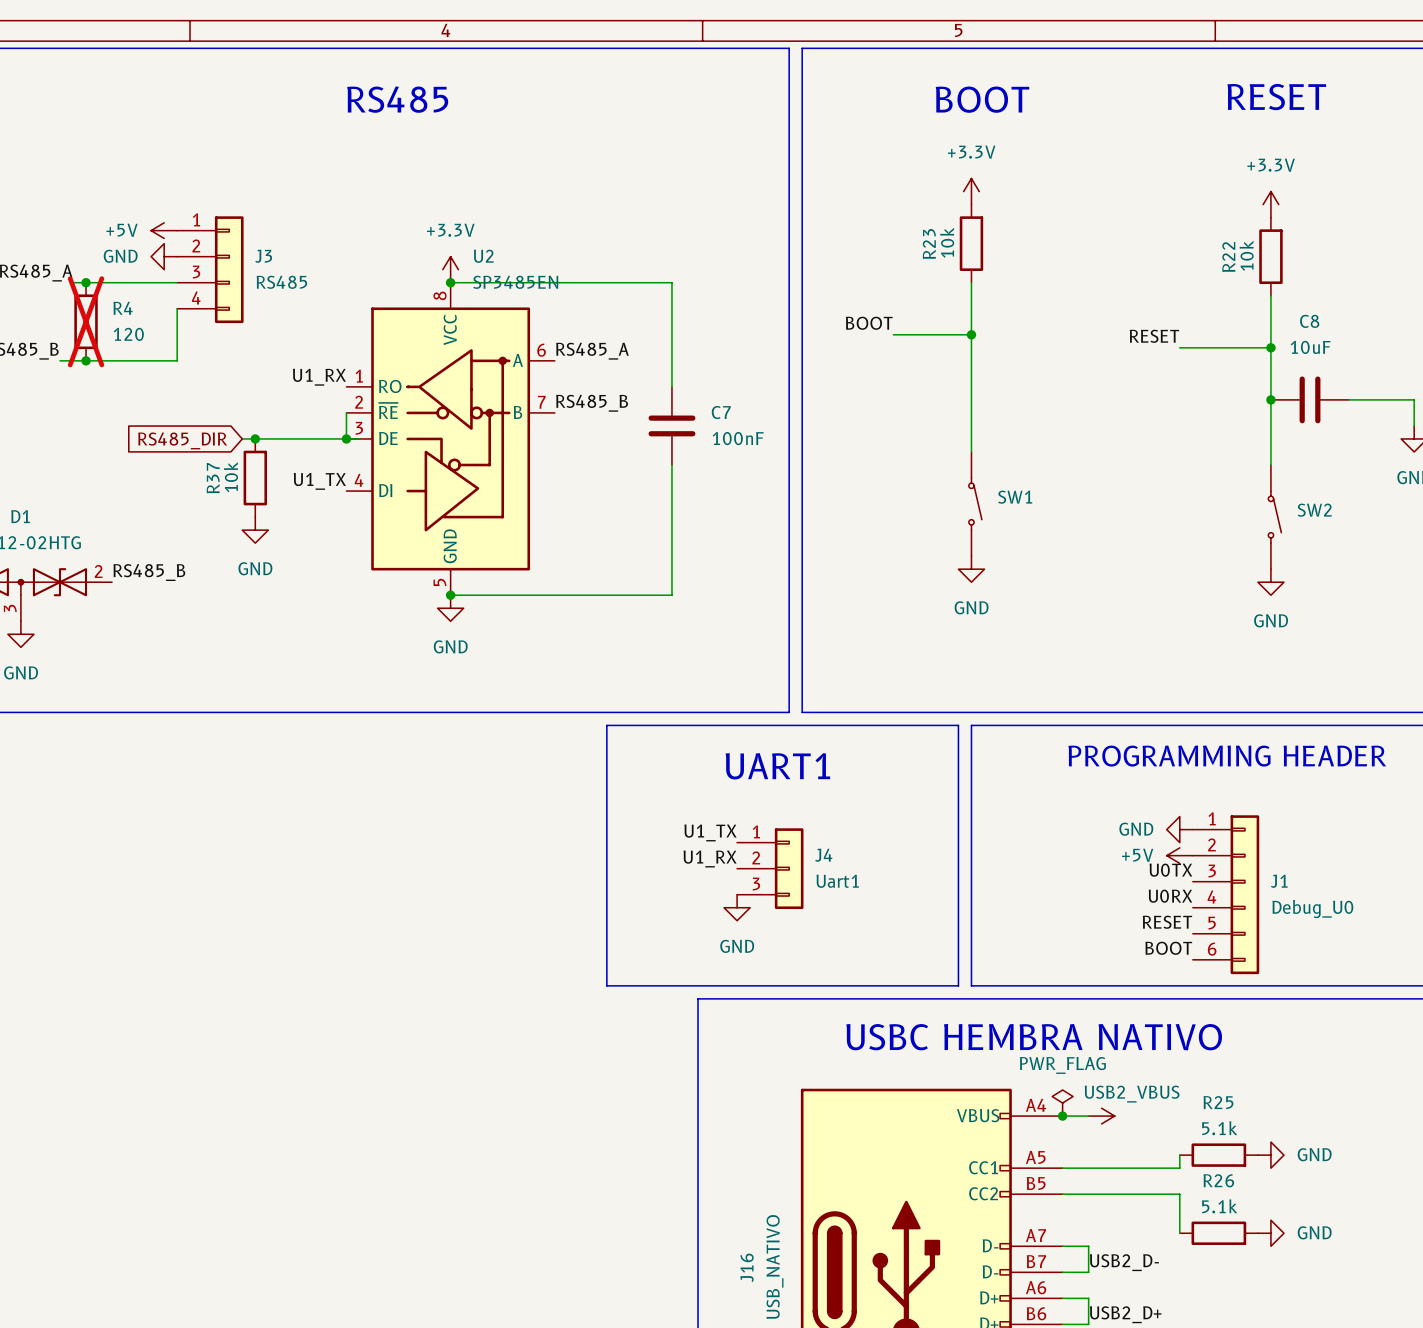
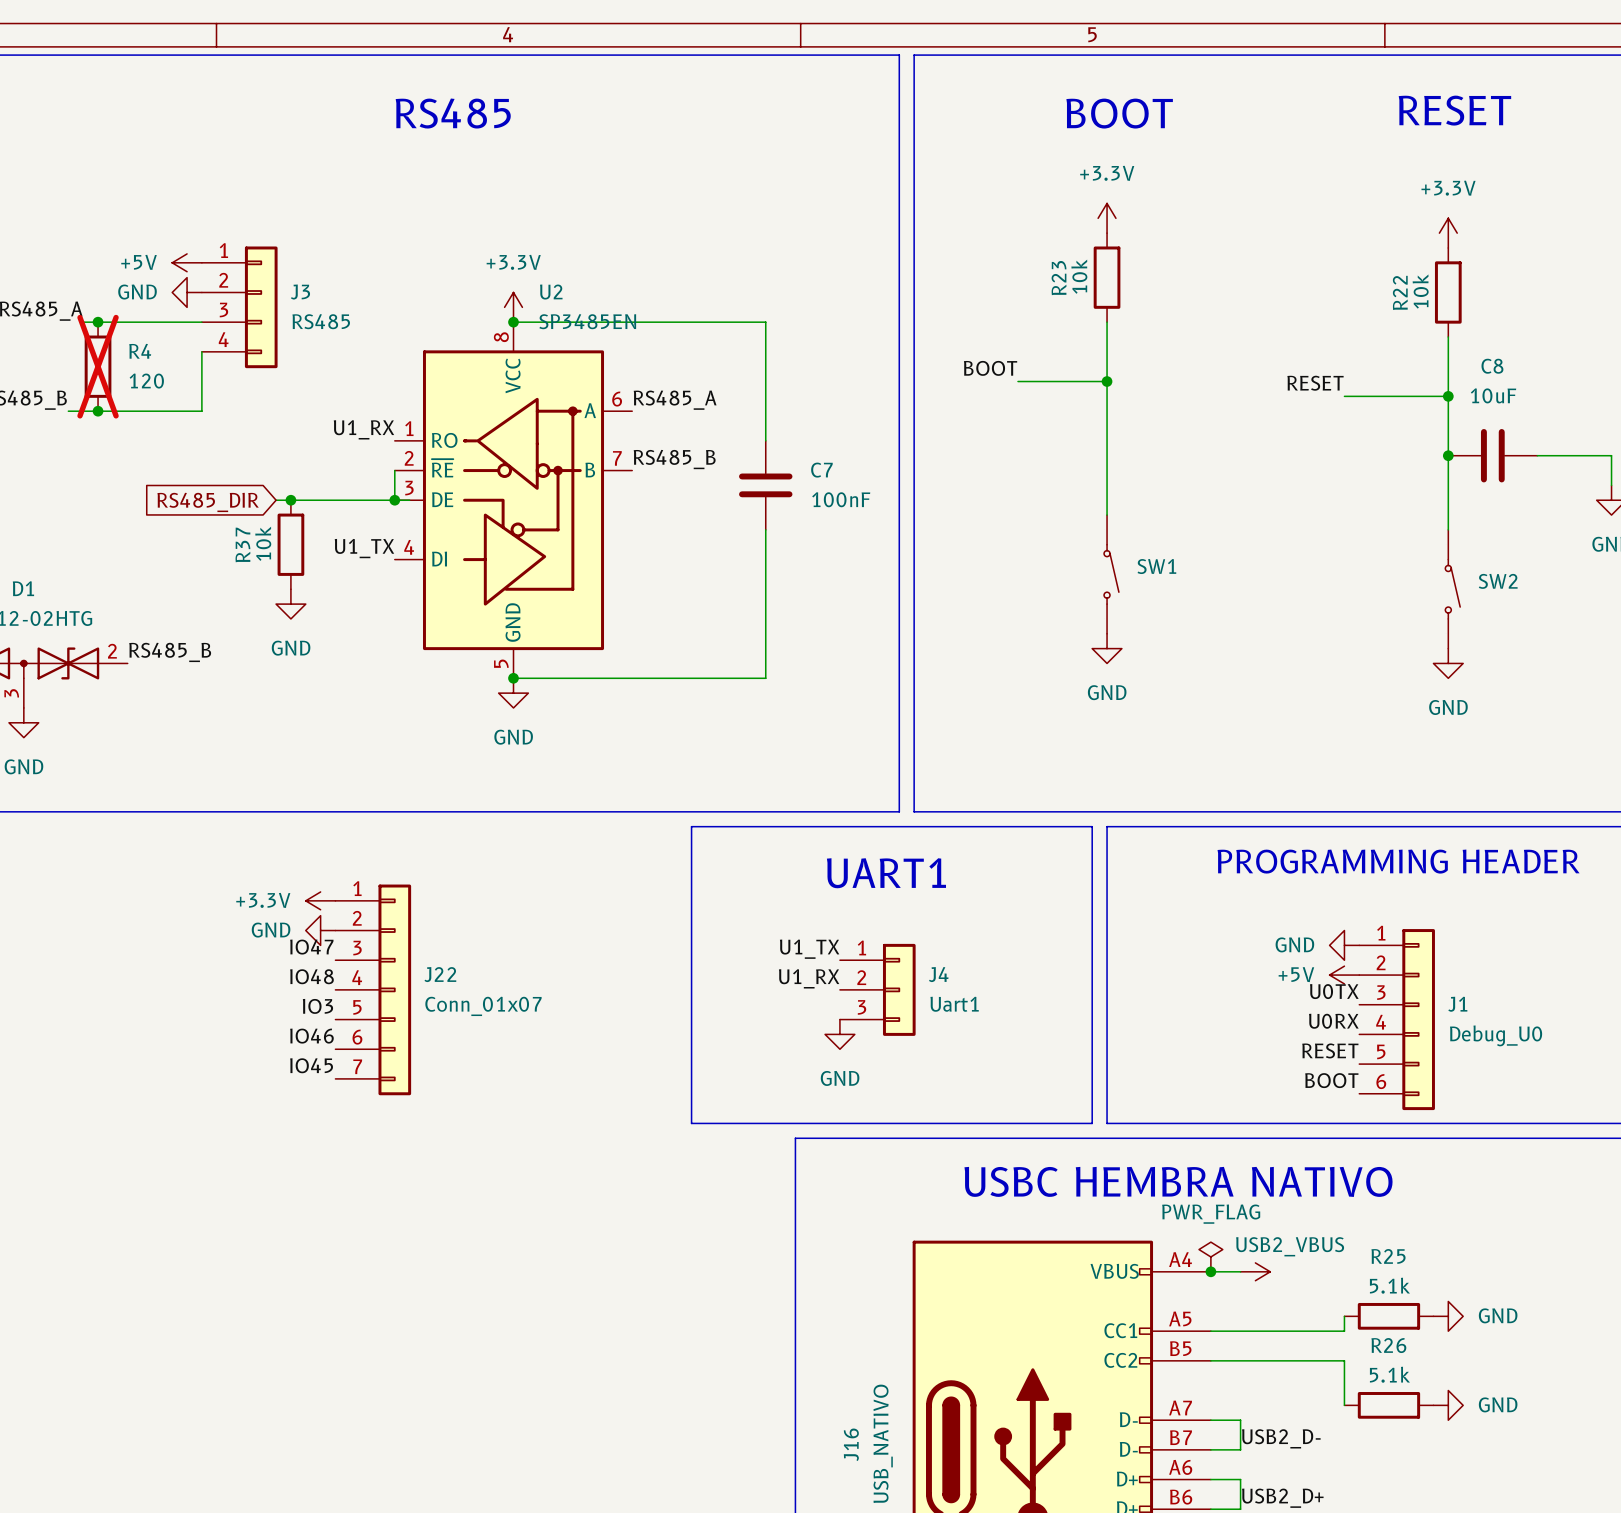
power symbol: none -> +3.3V (320, 900)
power symbol: none -> GND (320, 930)
label: none -> IO47 (311, 947)
label: none -> IO48 (311, 976)
J22: none -> Conn_01x07 (373, 989)
label: none -> IO3 (317, 1006)
label: none -> IO46 (311, 1036)
label: none -> IO45 (311, 1065)

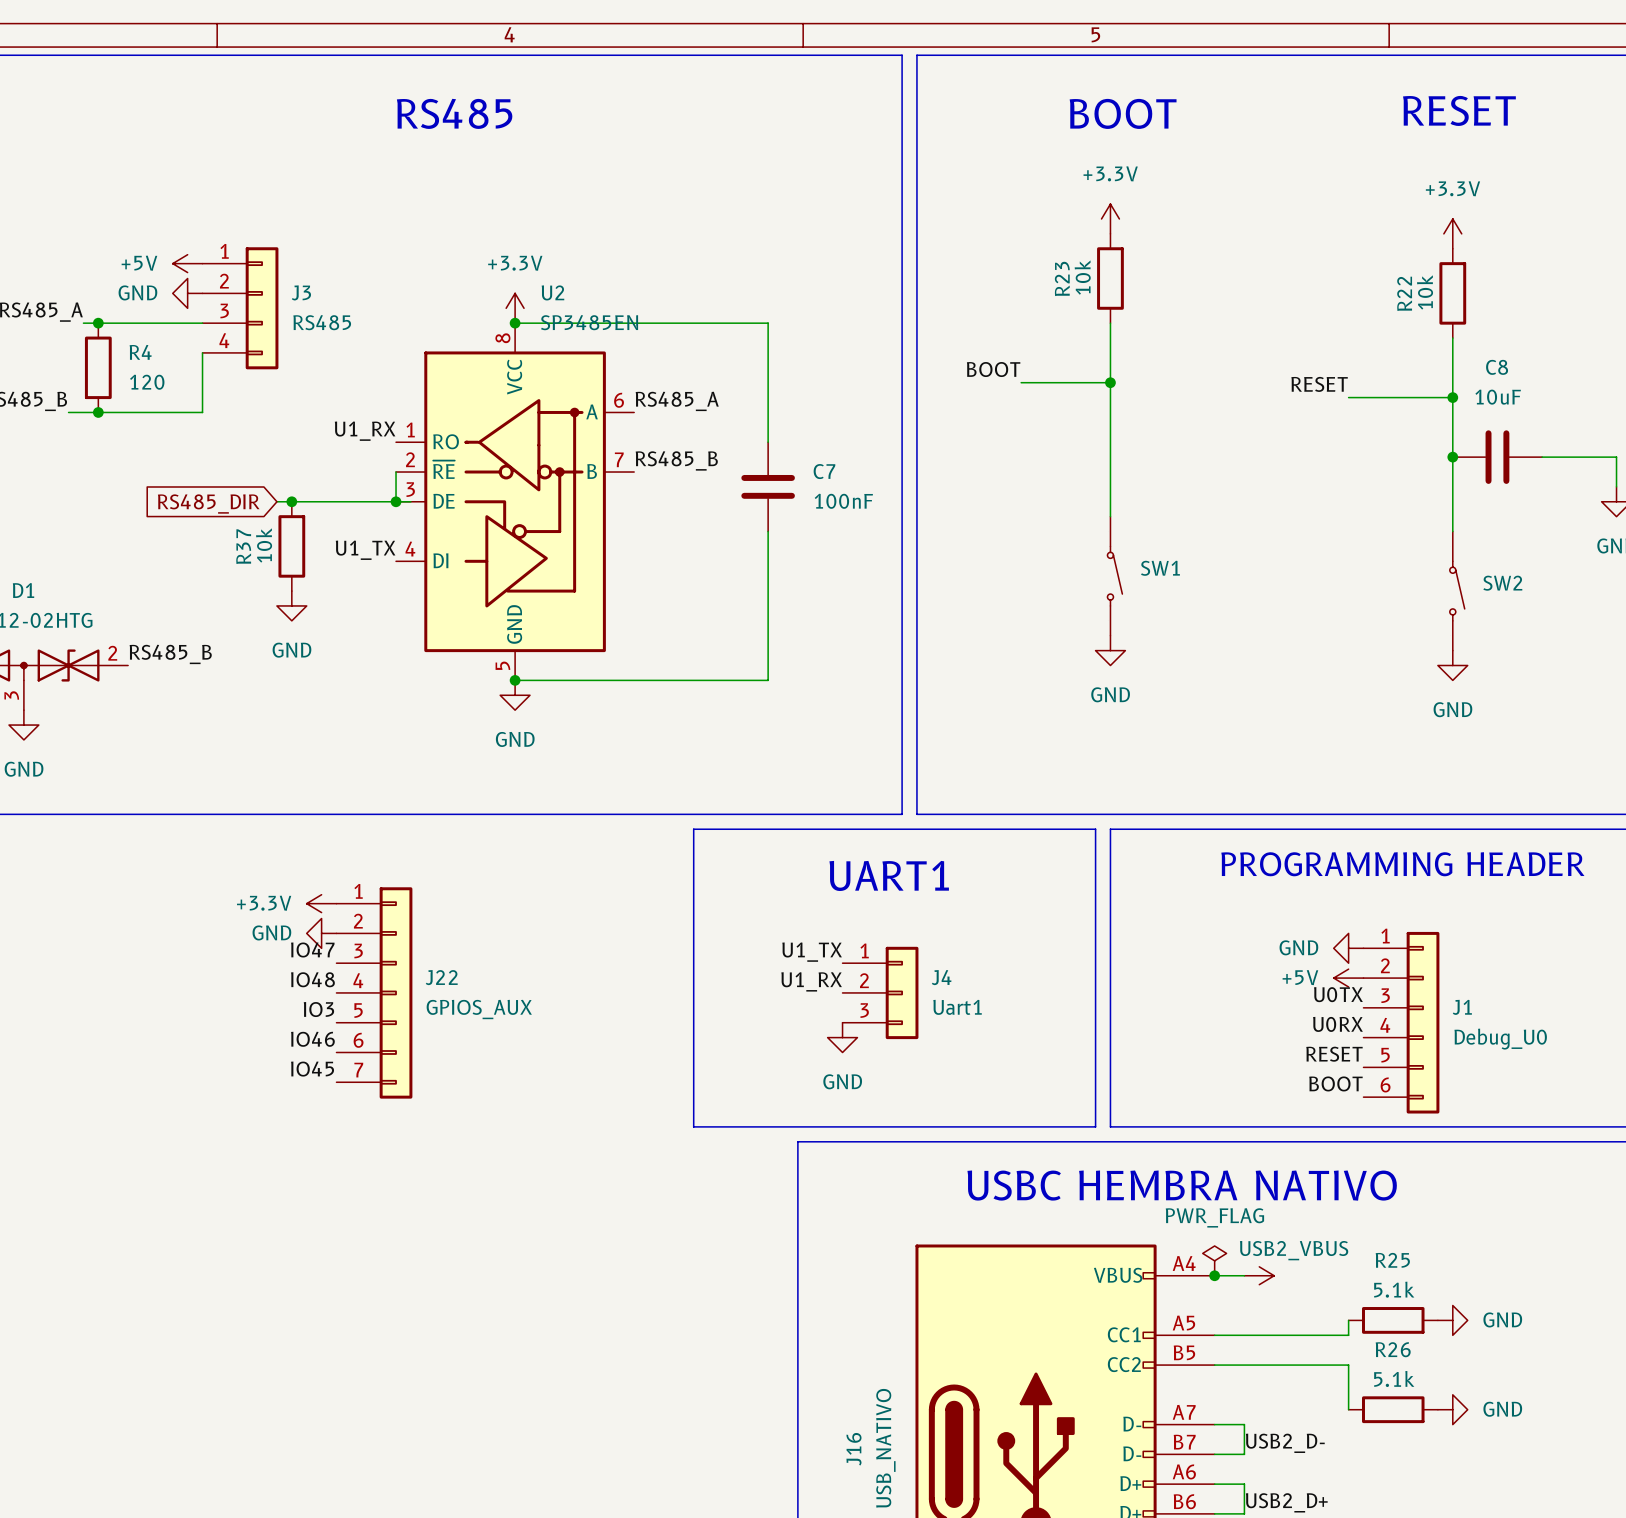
R4 do-not-place cross: (98, 366) -> none
J22 value: Conn_01x07 (483, 1006) -> GPIOS_AUX (479, 1009)

